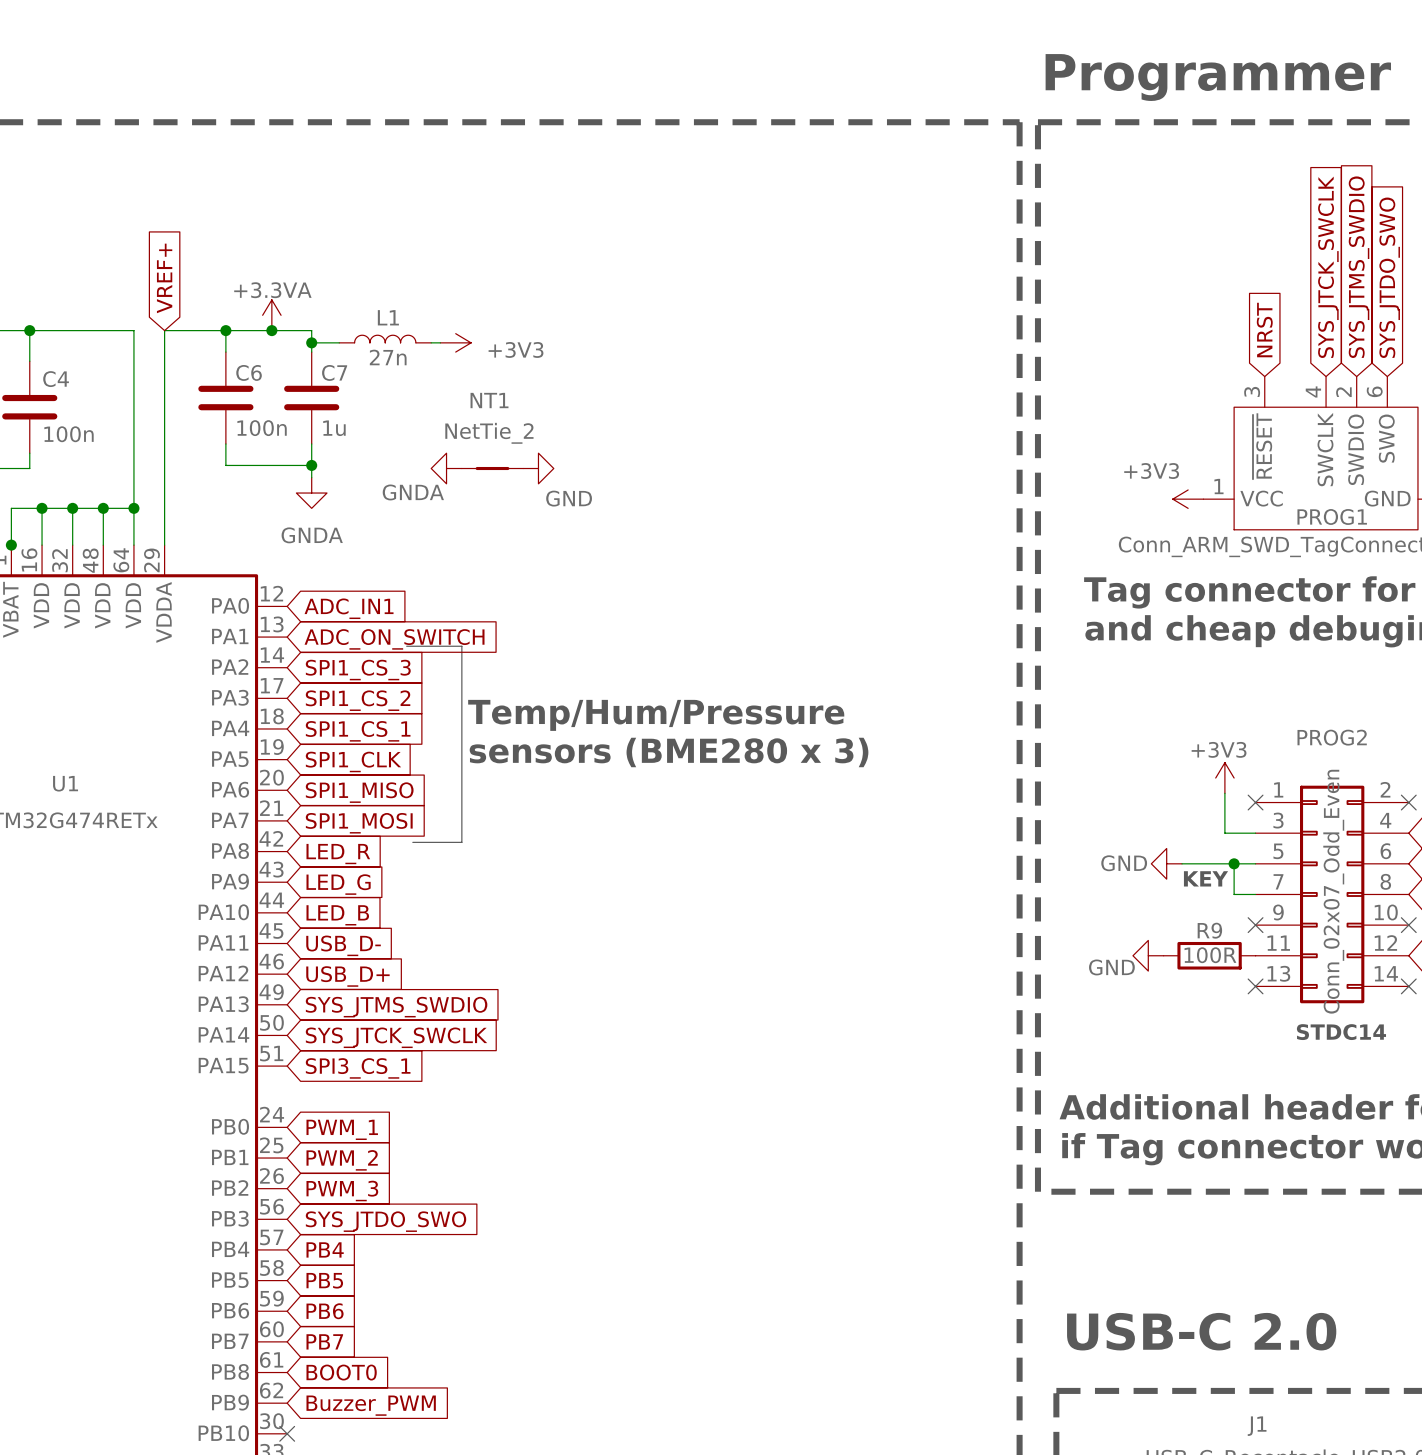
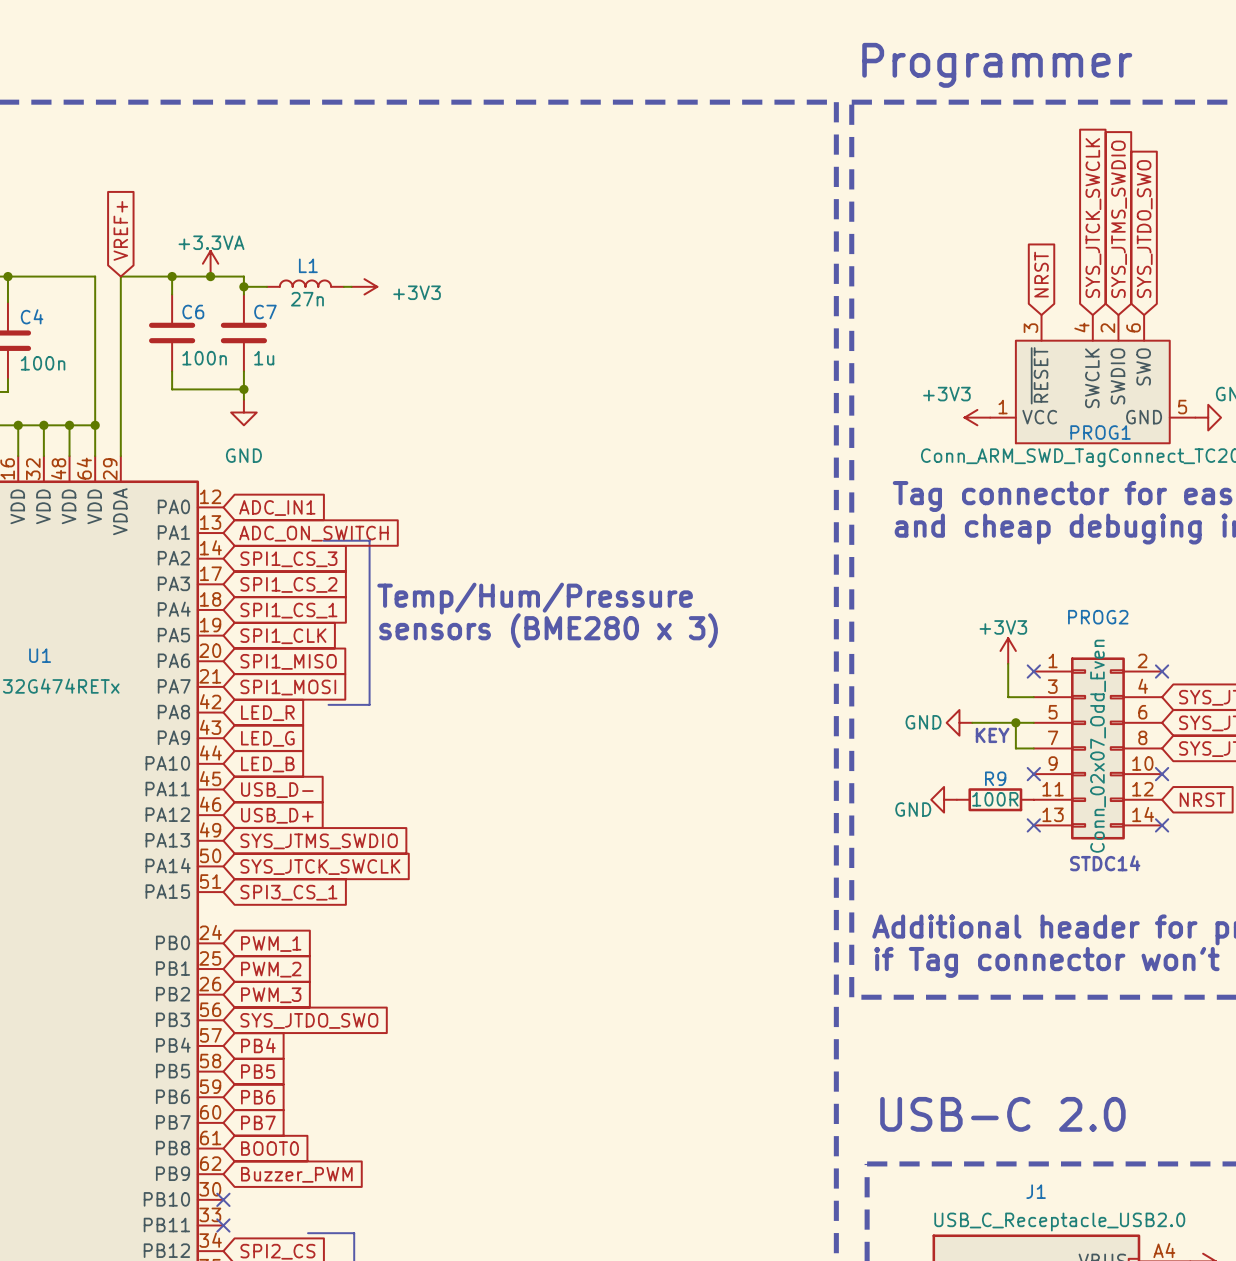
power symbol: GNDA (446, 468) -> none
NT1: NetTie_2 (492, 468) -> none
power symbol: GND (538, 468) -> none
power symbol: GNDA (311, 493) -> GND (243, 412)

